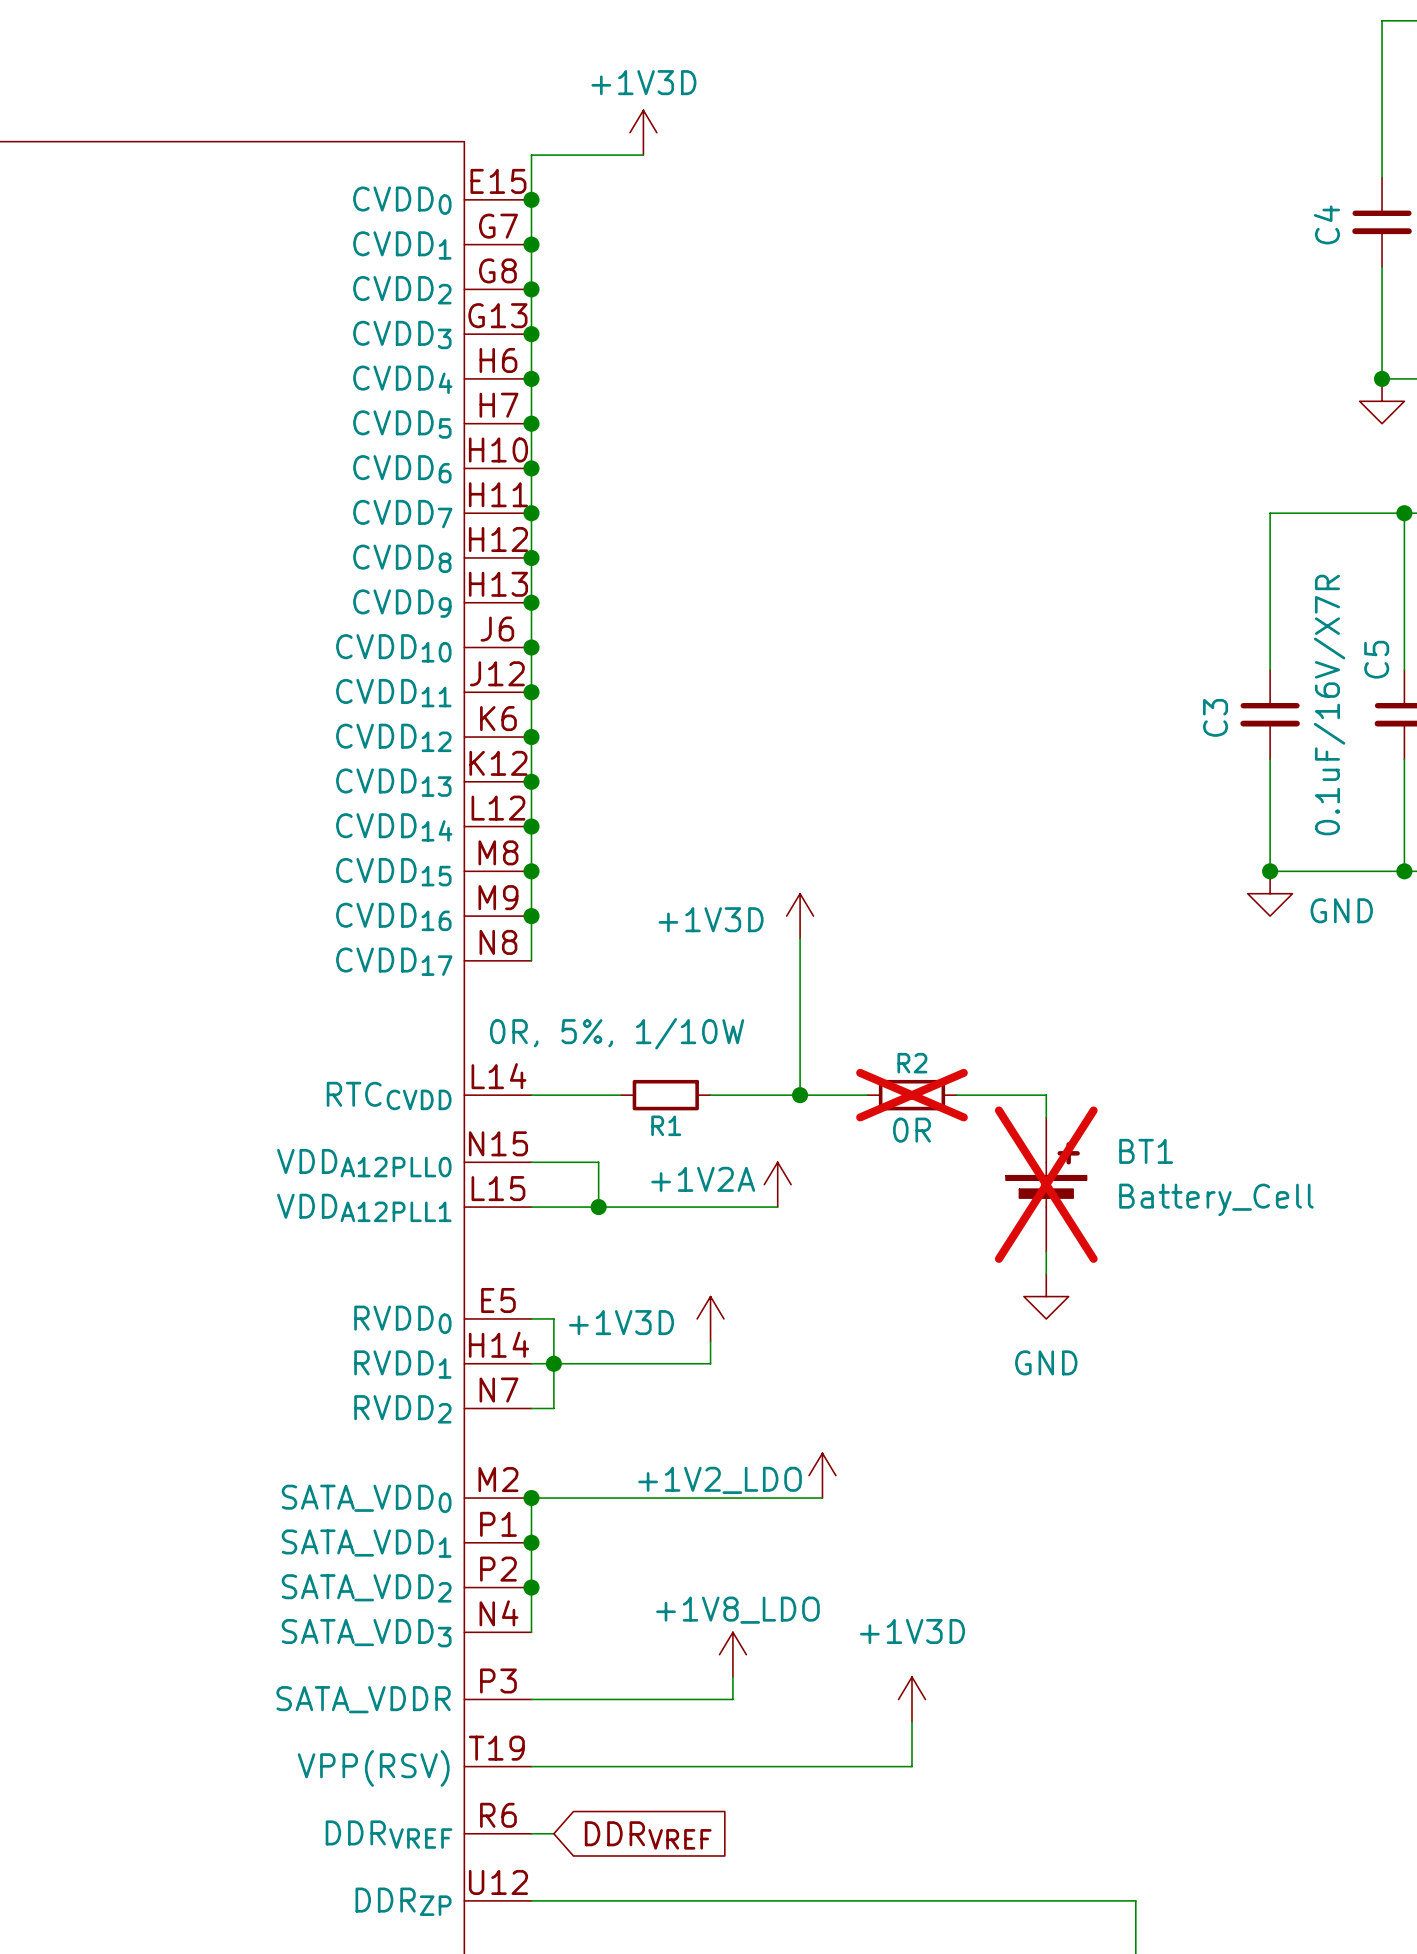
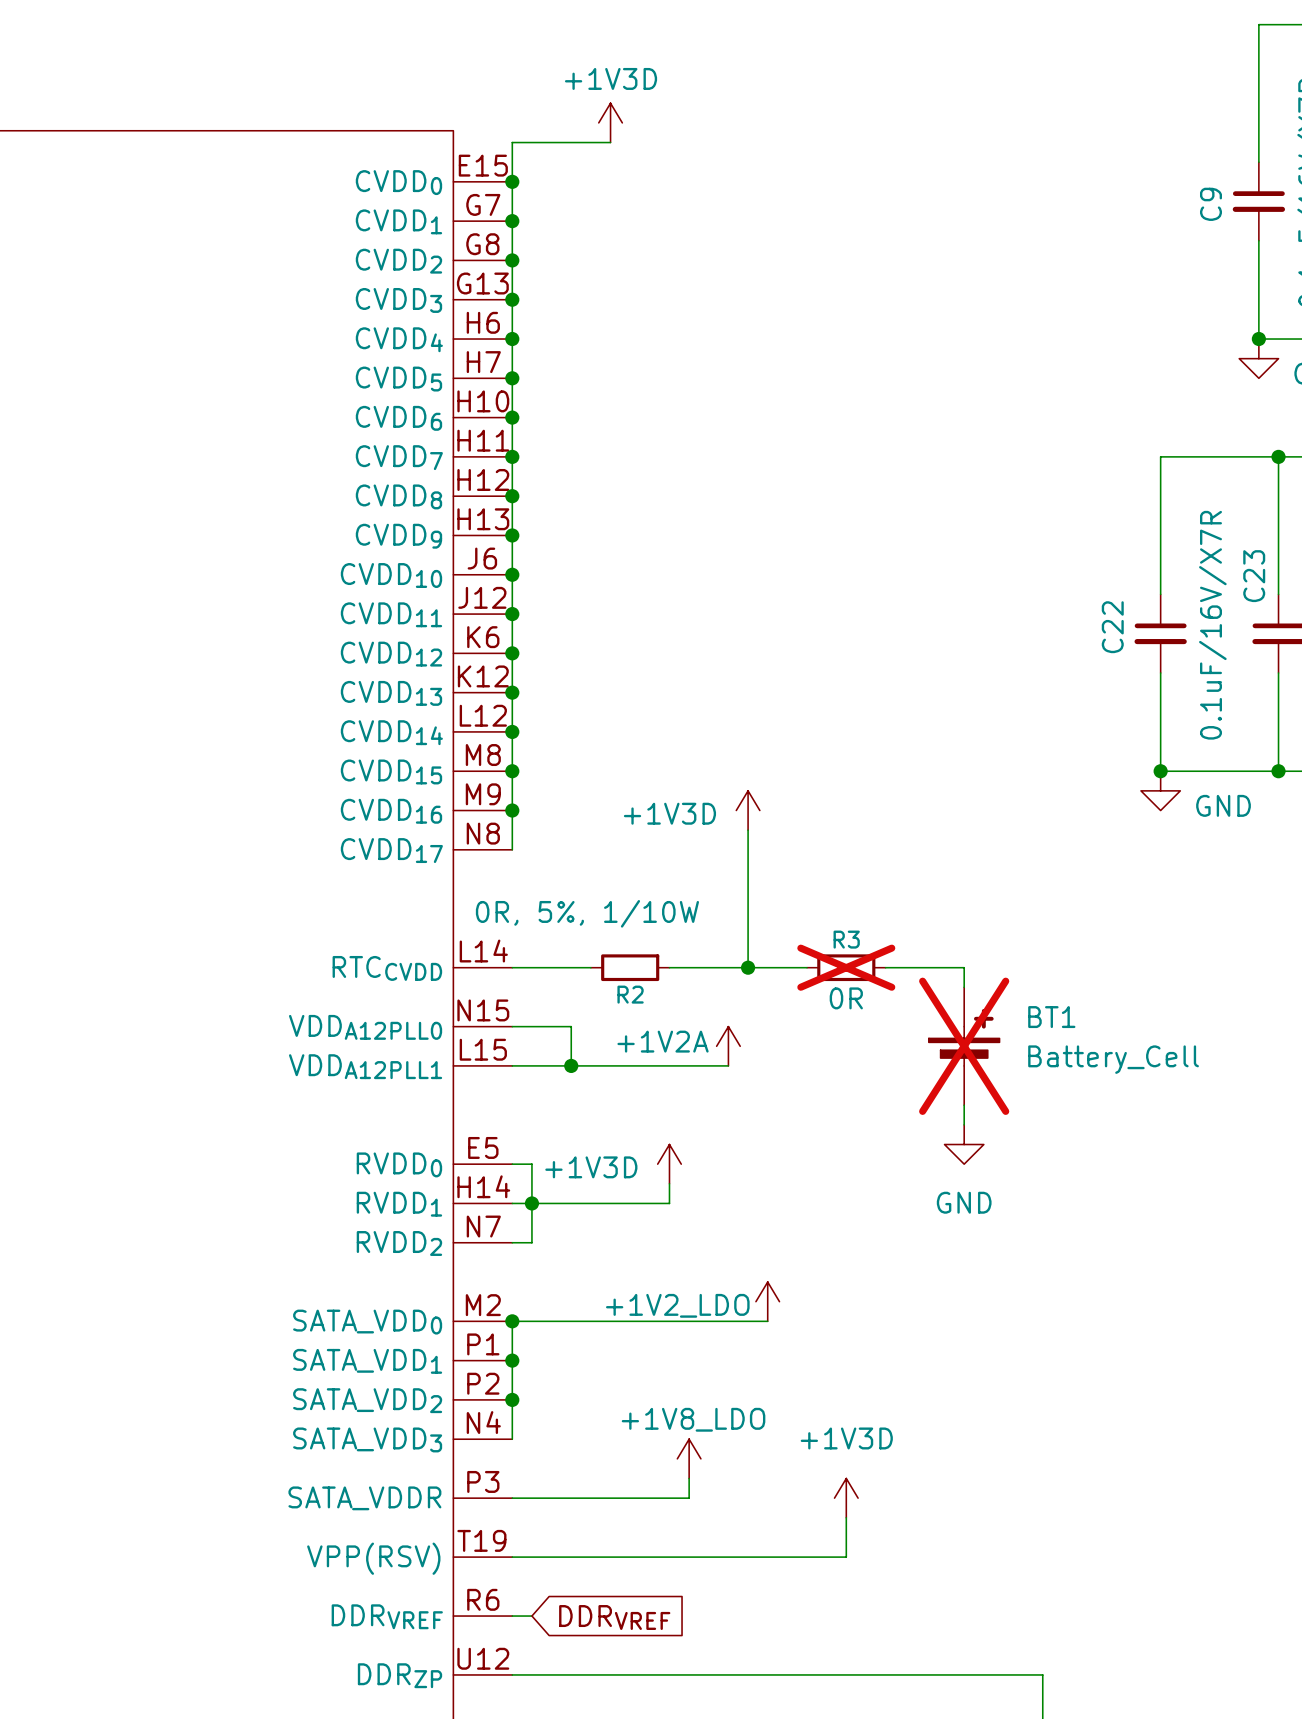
C4 name: C4 (1326, 224) -> C9 (1210, 204)
C5 name: C5 (1376, 659) -> C23 (1254, 576)
C3 name: C3 (1215, 717) -> C22 (1112, 627)
R2 name: R2 (912, 1063) -> R3 (846, 939)
R1 name: R1 (666, 1125) -> R2 (630, 994)

